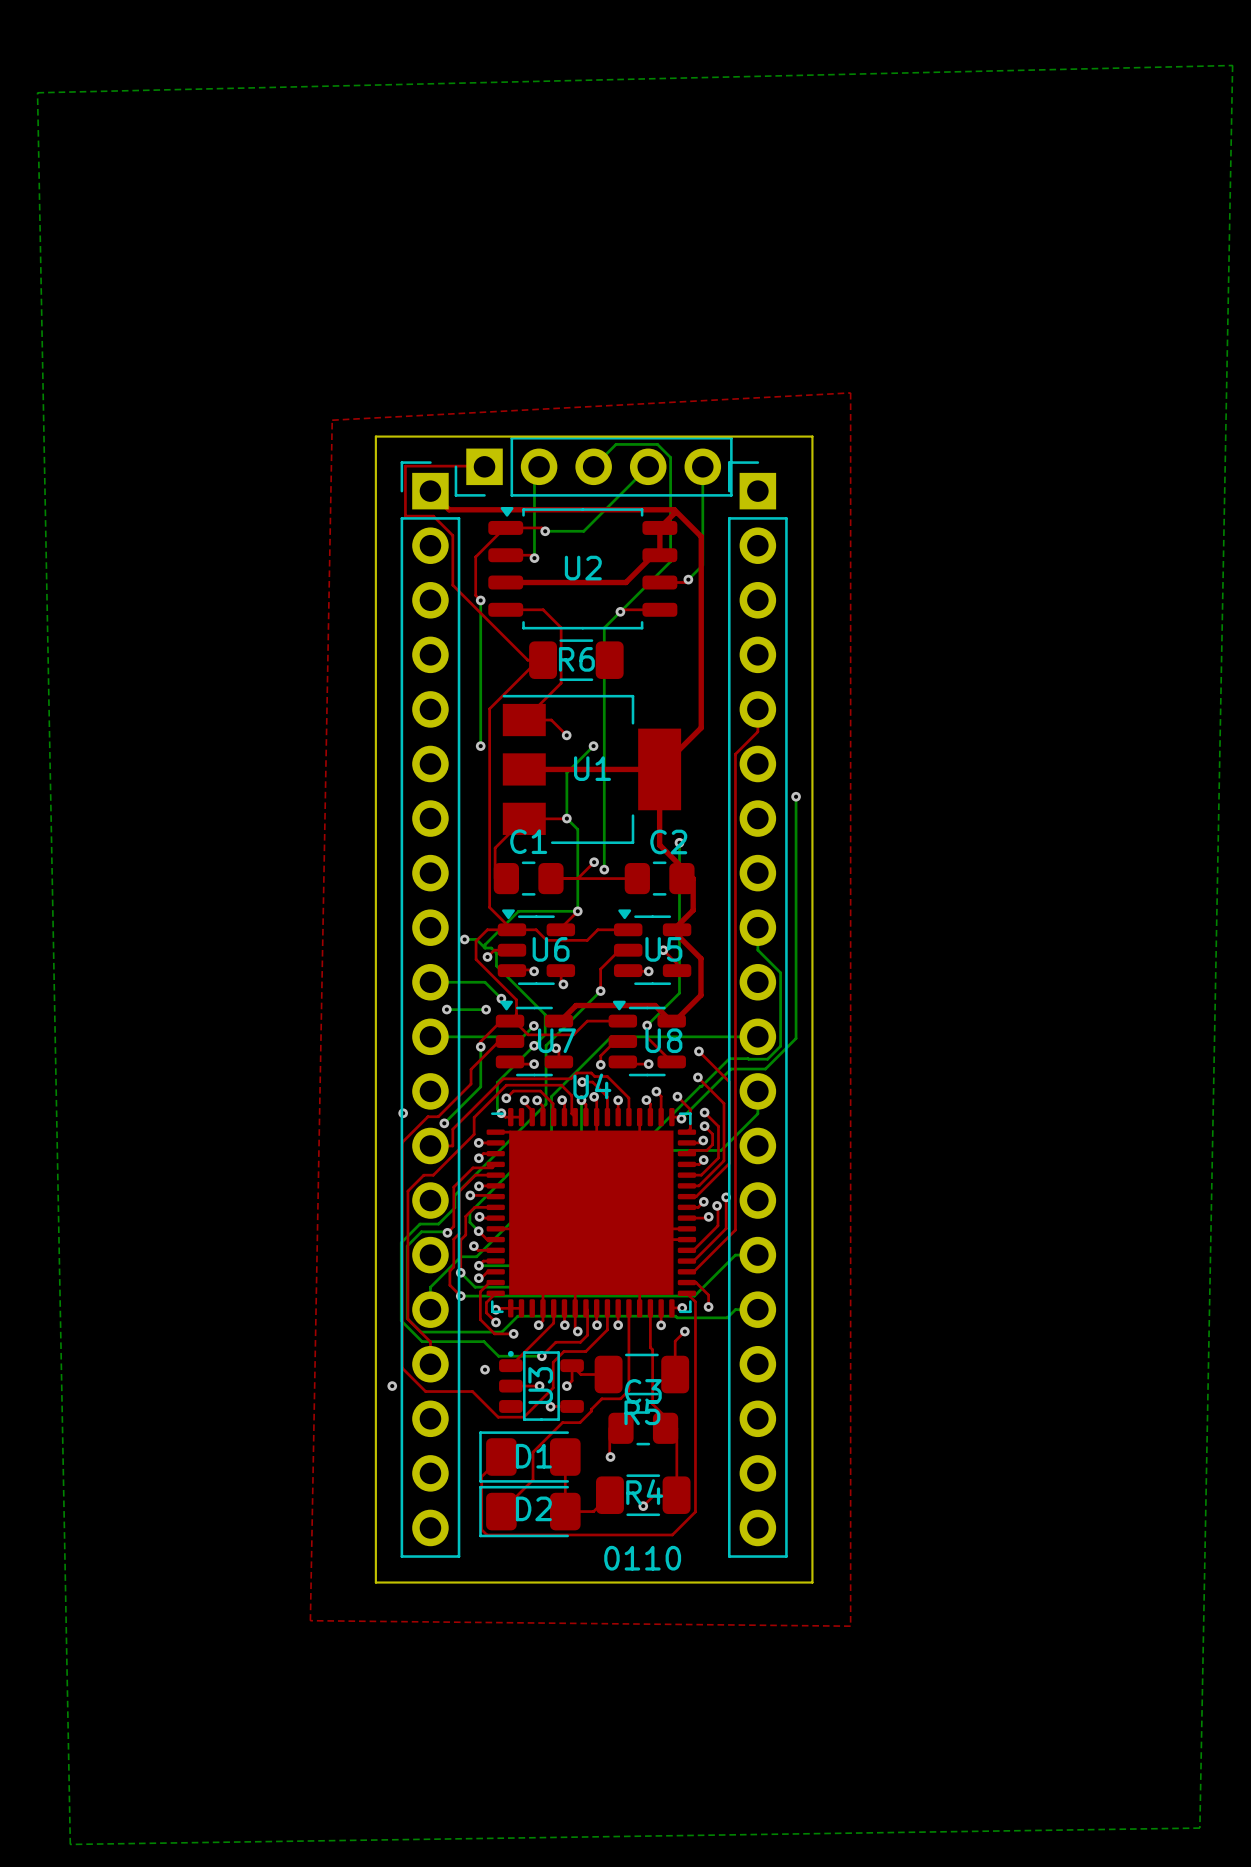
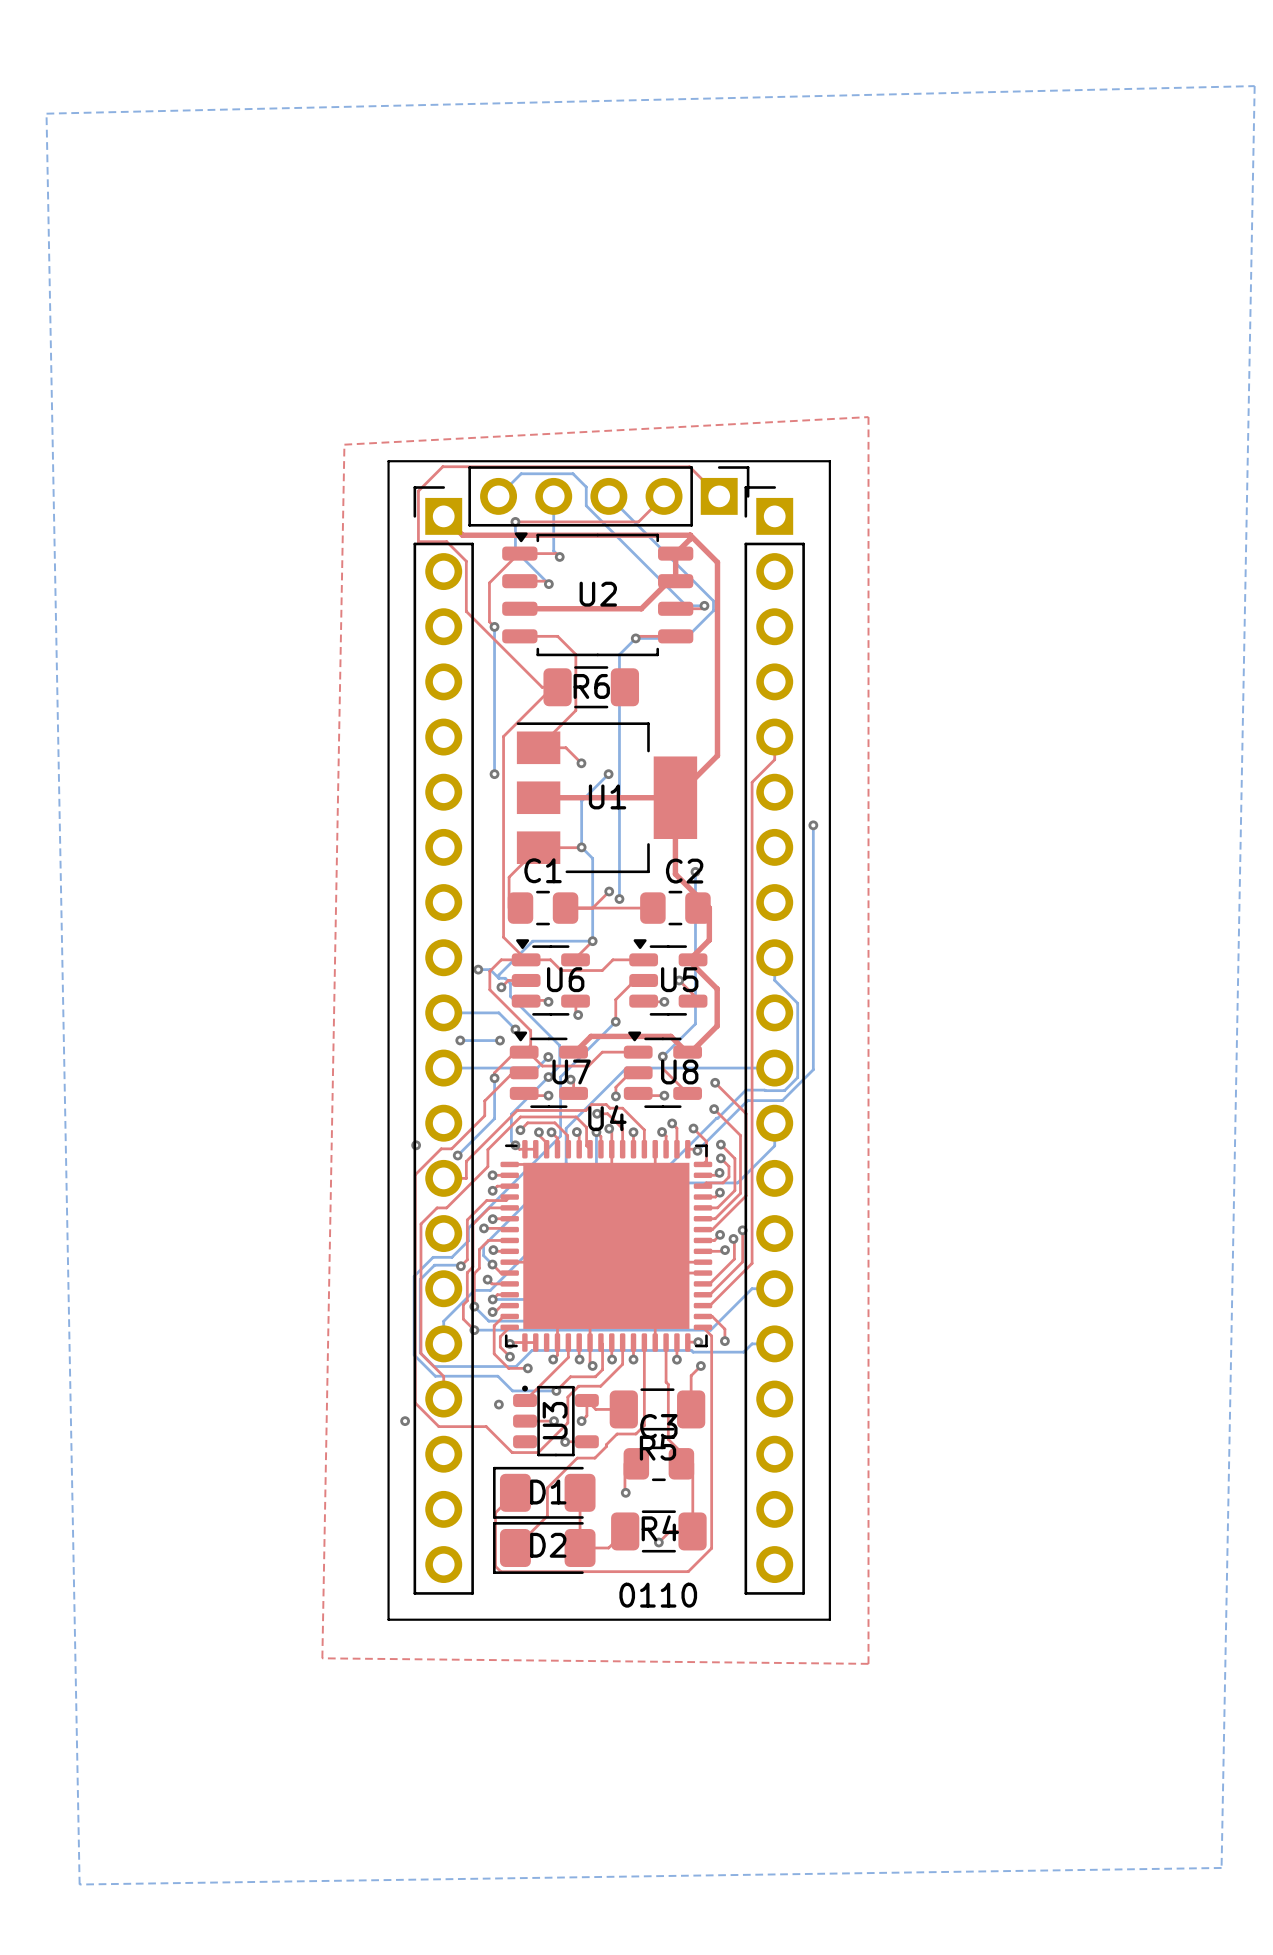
top track: (405, 466) (484, 466) -> (418, 491) (442, 466) (689, 466) (719, 496)
bottom track: (539, 466) (534, 471) (534, 558) -> (515, 521) (515, 550) (548, 584)
bottom track: (593, 466) (616, 444) (657, 444) (670, 457) (670, 561) (620, 611) -> (608, 496) (713, 601) (713, 610) (685, 638) (635, 638)
part rotation: 0° (593, 466) -> 180° (608, 496)
bottom track: (648, 466) (583, 531) (545, 531) -> (553, 496) (553, 550) (559, 556)
bottom track: (702, 466) (702, 565) (688, 579) -> (498, 496) (521, 473) (573, 473) (586, 487) (586, 505) (686, 605) (704, 605)
top track: none -> (664, 496) (638, 521) (515, 521)
via: none -> (515, 521)

